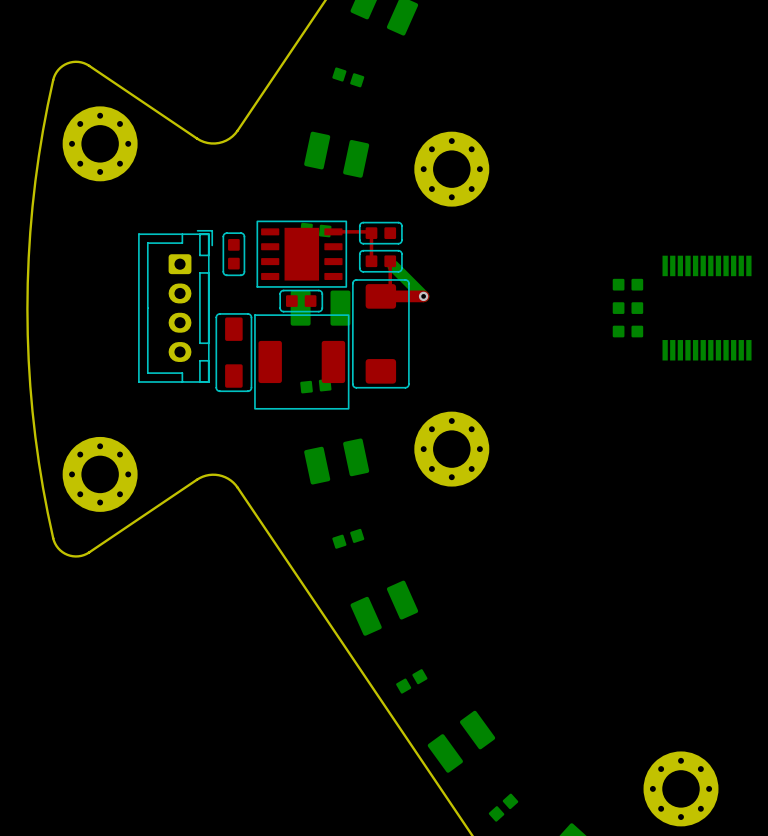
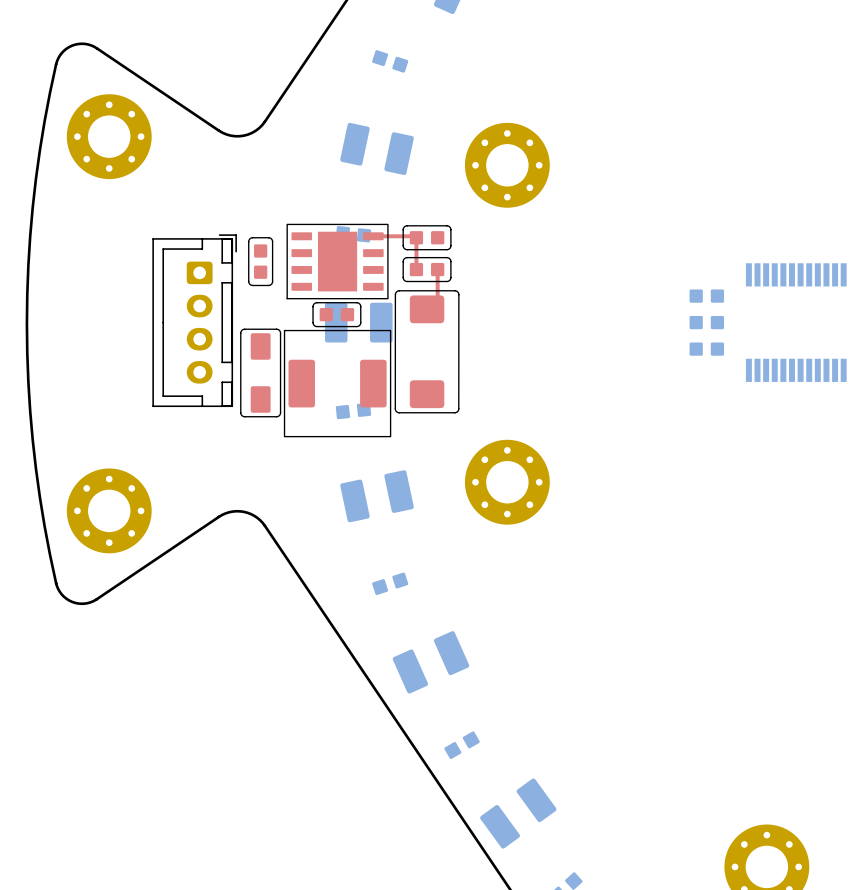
bottom track: (393, 265) (423, 296) -> none
top track: (380, 296) (423, 296) -> none
via: (423, 296) -> none

